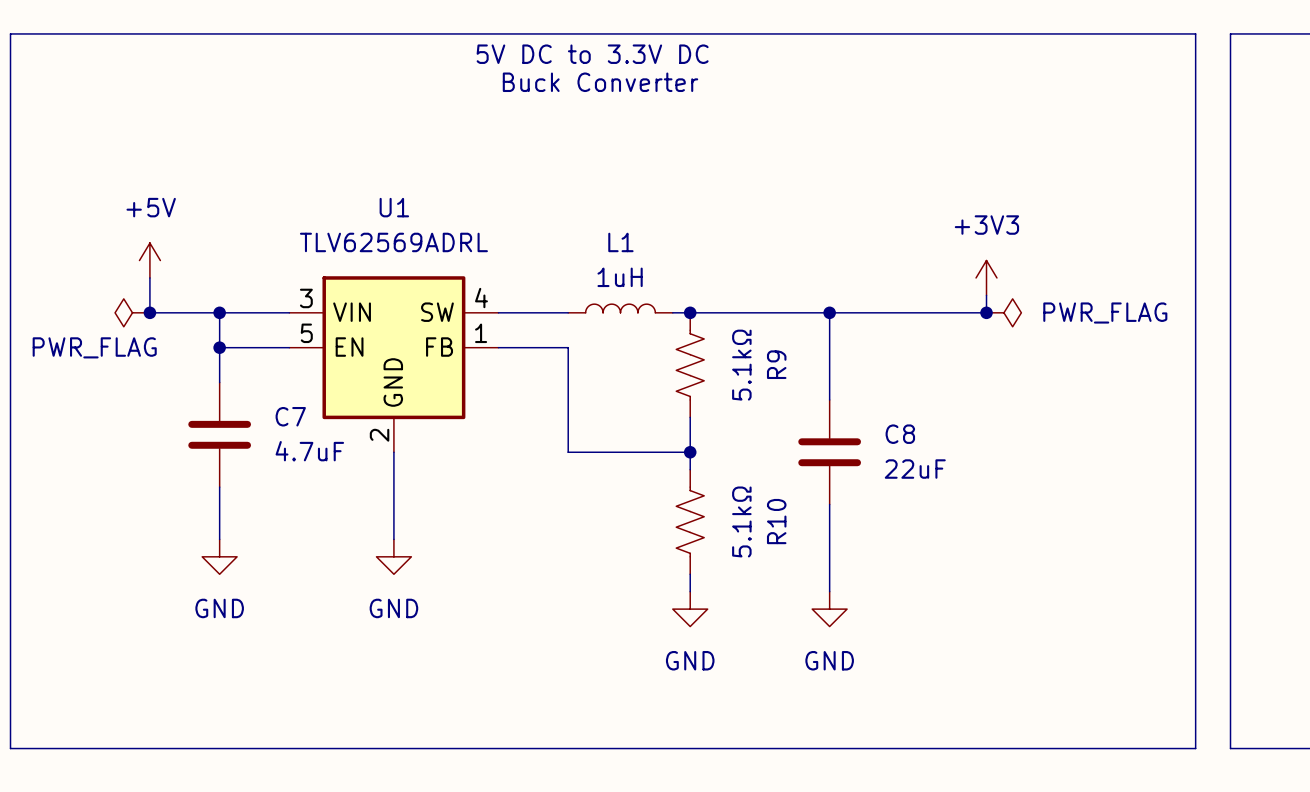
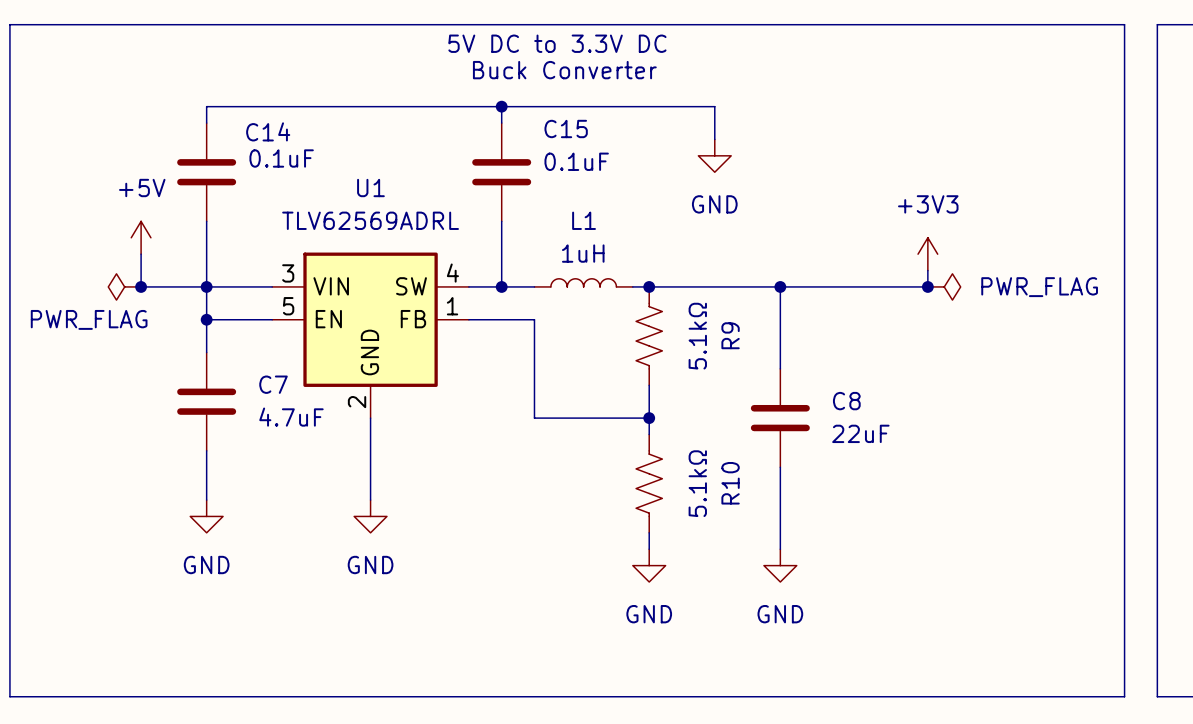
wire: none -> (501, 106) (501, 123)
junction: none -> (501, 106)
wire: none -> (206, 123) (206, 106) (714, 106) (714, 139)
power symbol: none -> GND (714, 155)
C14: none -> 0.1uF (206, 172)
C15: none -> 0.1uF (501, 172)
wire: none -> (206, 221) (206, 286)
wire: none -> (501, 221) (501, 286)
junction: none -> (501, 286)

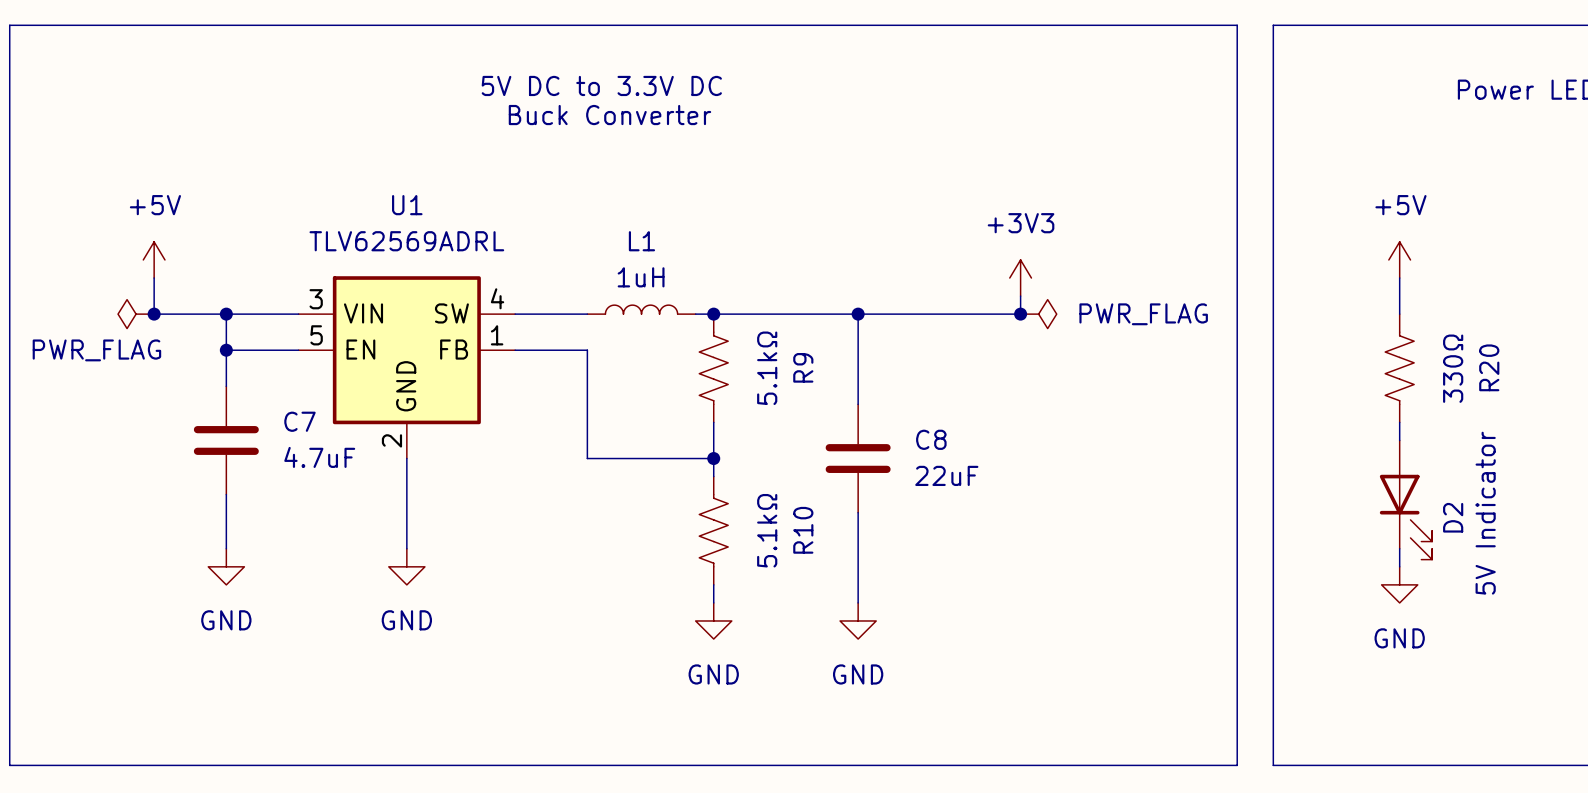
text position: 5V DC to 3.3V DC (557, 43) -> 5V DC to 3.3V DC (601, 85)
text position: Buck Converter (564, 70) -> Buck Converter (609, 115)
wire: (501, 106) (501, 123) -> none
junction: (501, 106) -> none
wire: (206, 123) (206, 106) (714, 106) (714, 139) -> none
power symbol: GND (714, 155) -> none
C14: 0.1uF (206, 172) -> none
C15: 0.1uF (501, 172) -> none
wire: (206, 221) (206, 286) -> none
wire: (501, 221) (501, 286) -> none
junction: (501, 286) -> none

